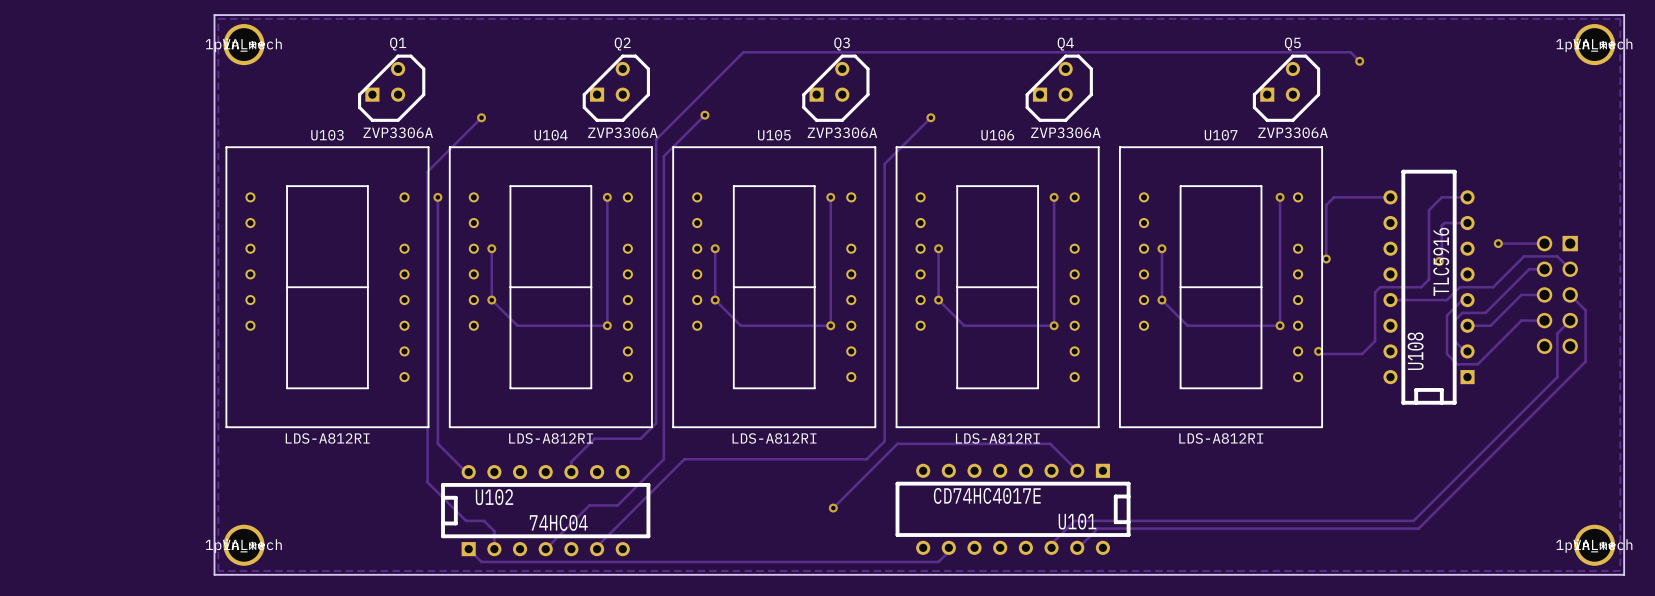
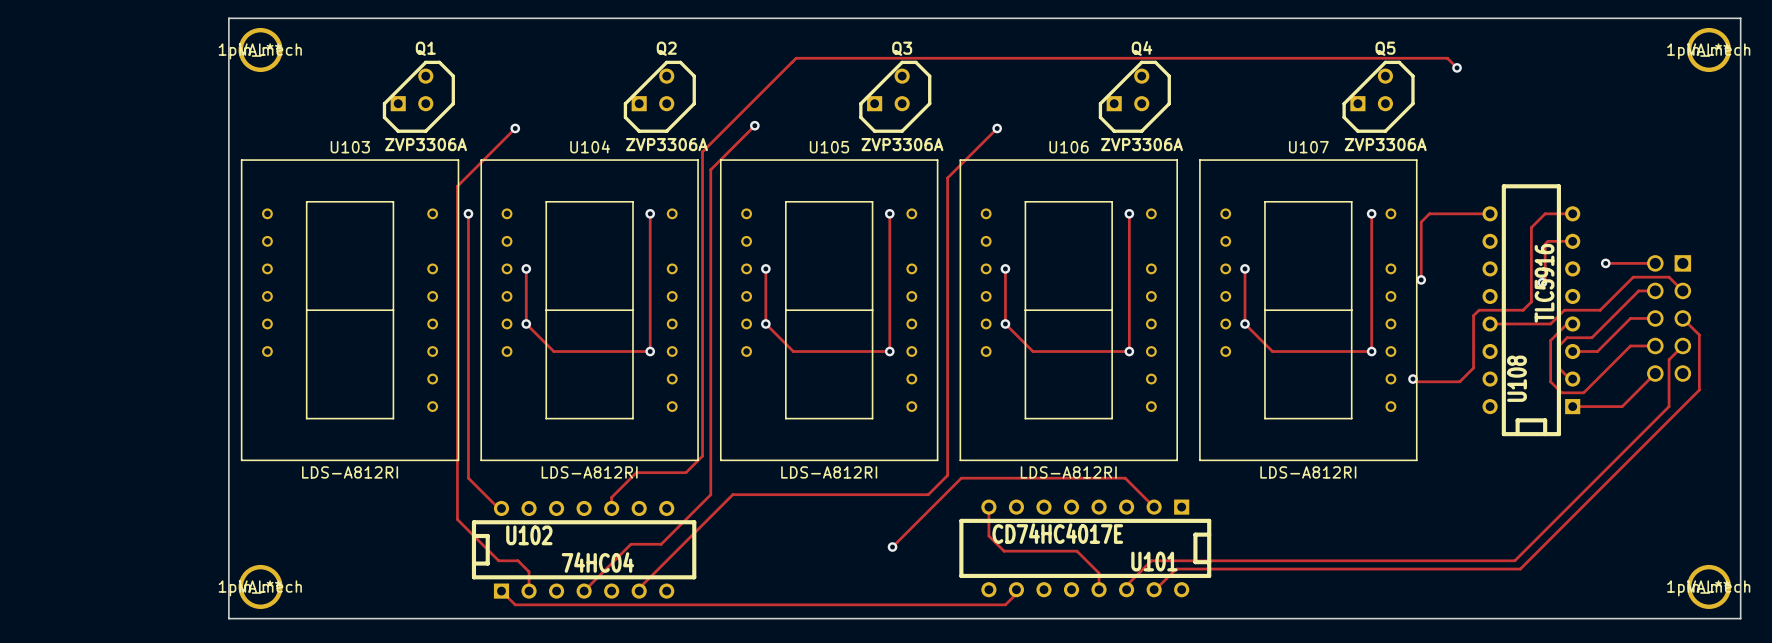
zone outline: (218, 18) (218, 570) (1620, 570) (1620, 18) (218, 18) -> none
track: none -> (1655, 373) (1622, 406) (1572, 406)
track: none -> (988, 507) (988, 536) (1004, 551) (1077, 551) (1099, 573) (1099, 589)

